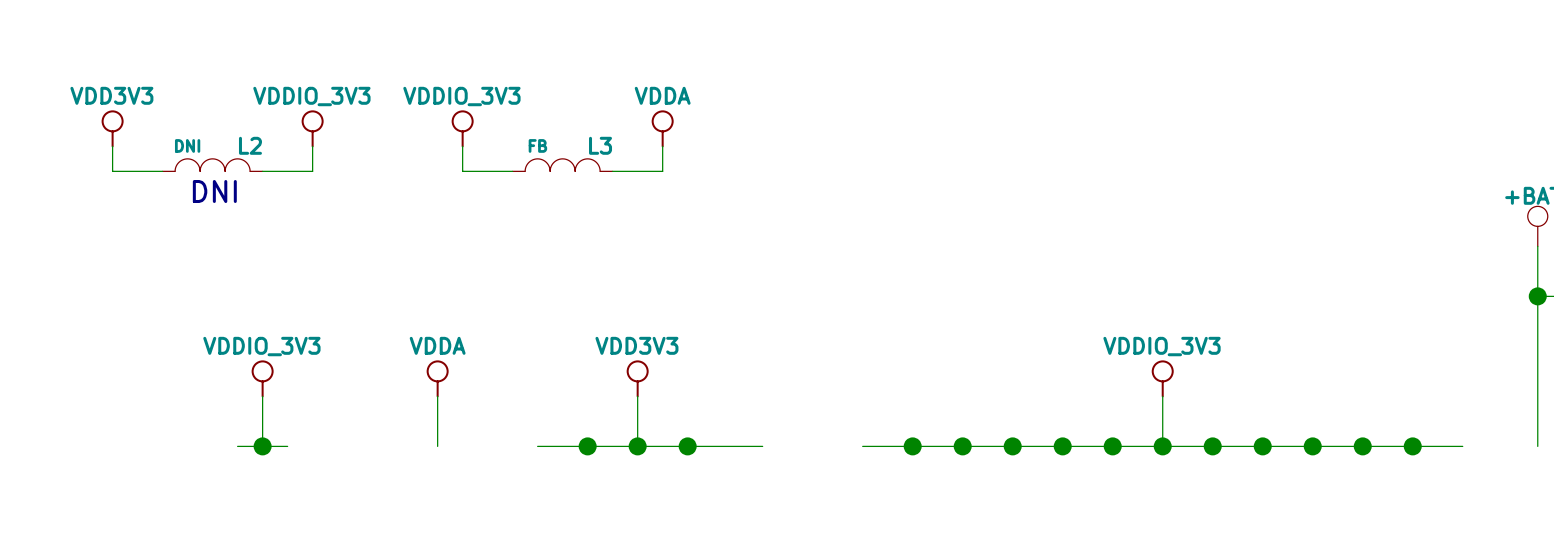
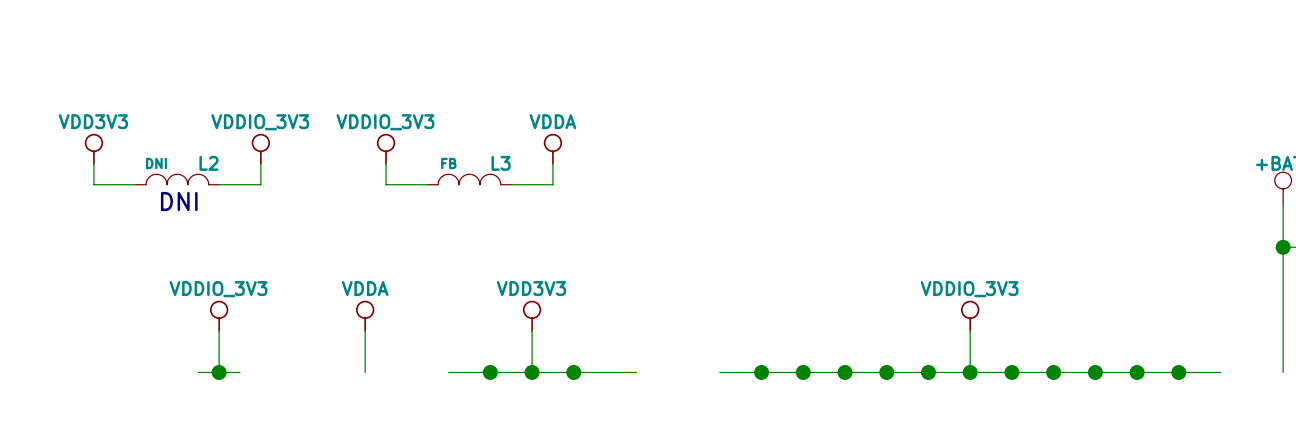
power symbol position: VDD3V3 (112, 128) -> VDD3V3 (93, 149)
power symbol position: VDDIO_3V3 (312, 128) -> VDDIO_3V3 (260, 149)
power symbol position: VDDIO_3V3 (462, 128) -> VDDIO_3V3 (386, 149)
power symbol position: VDDA (662, 128) -> VDDA (552, 149)
wire: (112, 146) (112, 171) (162, 171) -> (93, 163) (93, 184) (135, 184)
wire: (312, 146) (312, 171) (262, 171) -> (260, 163) (260, 184) (219, 184)
wire: (462, 146) (462, 171) (512, 171) -> (386, 163) (386, 184) (427, 184)
wire: (662, 146) (662, 171) (612, 171) -> (552, 163) (552, 184) (511, 184)
L2 position: (212, 165) -> (177, 179)
L3 position: (562, 165) -> (469, 179)
text position: DNI (214, 191) -> DNI (179, 201)

